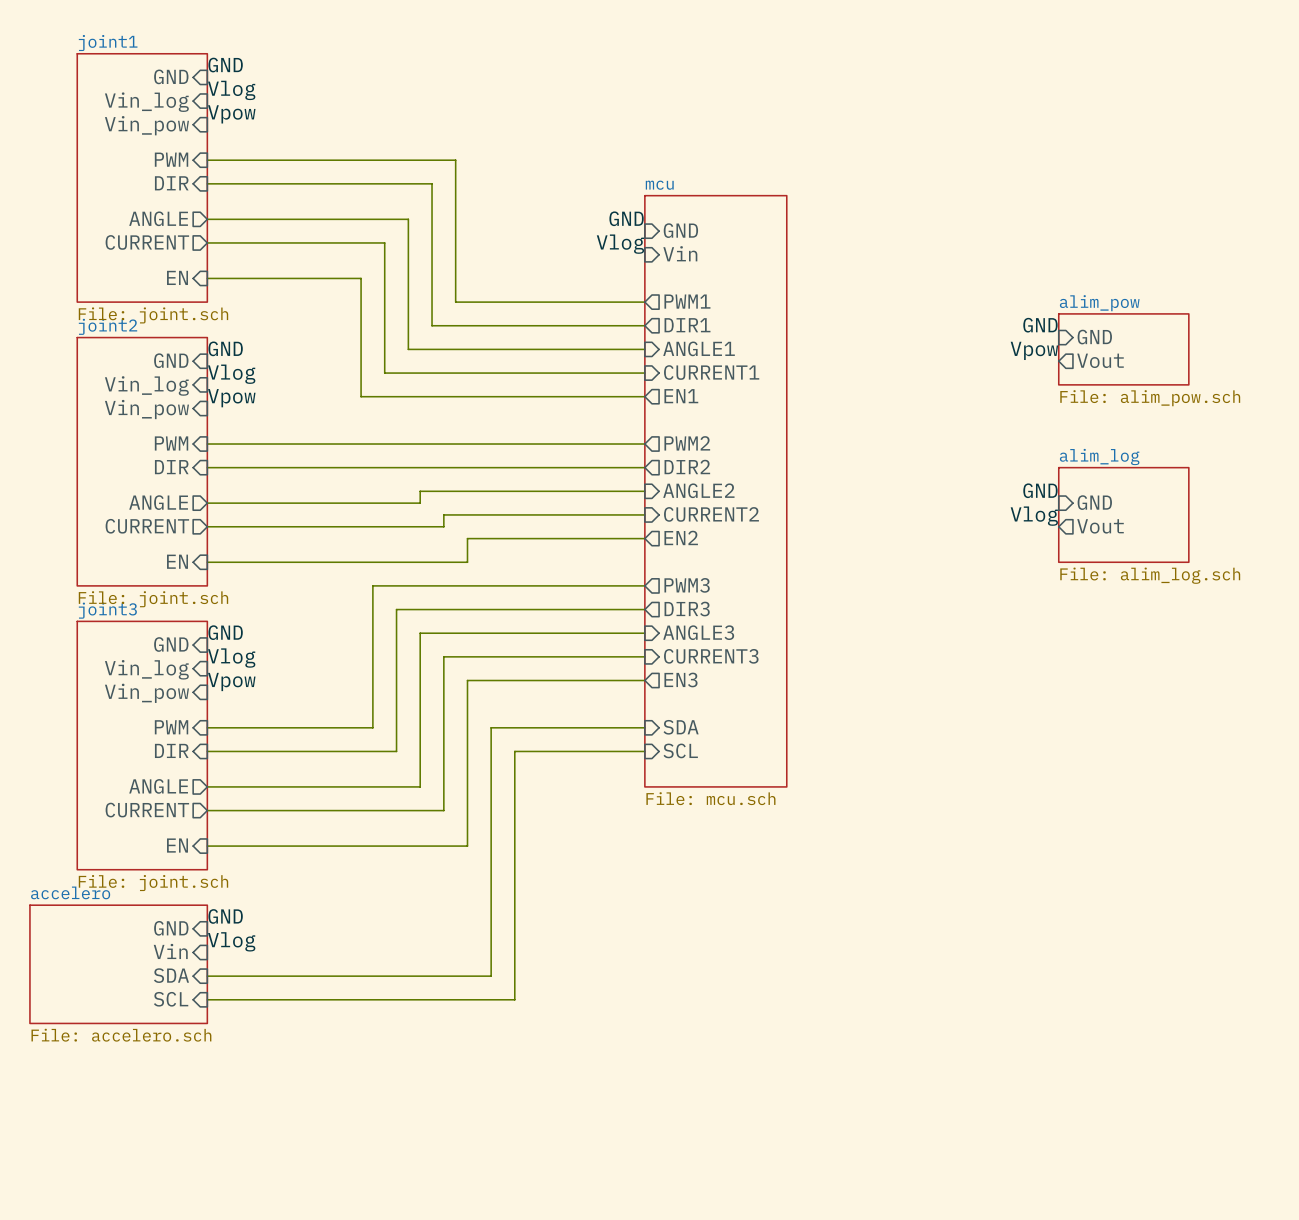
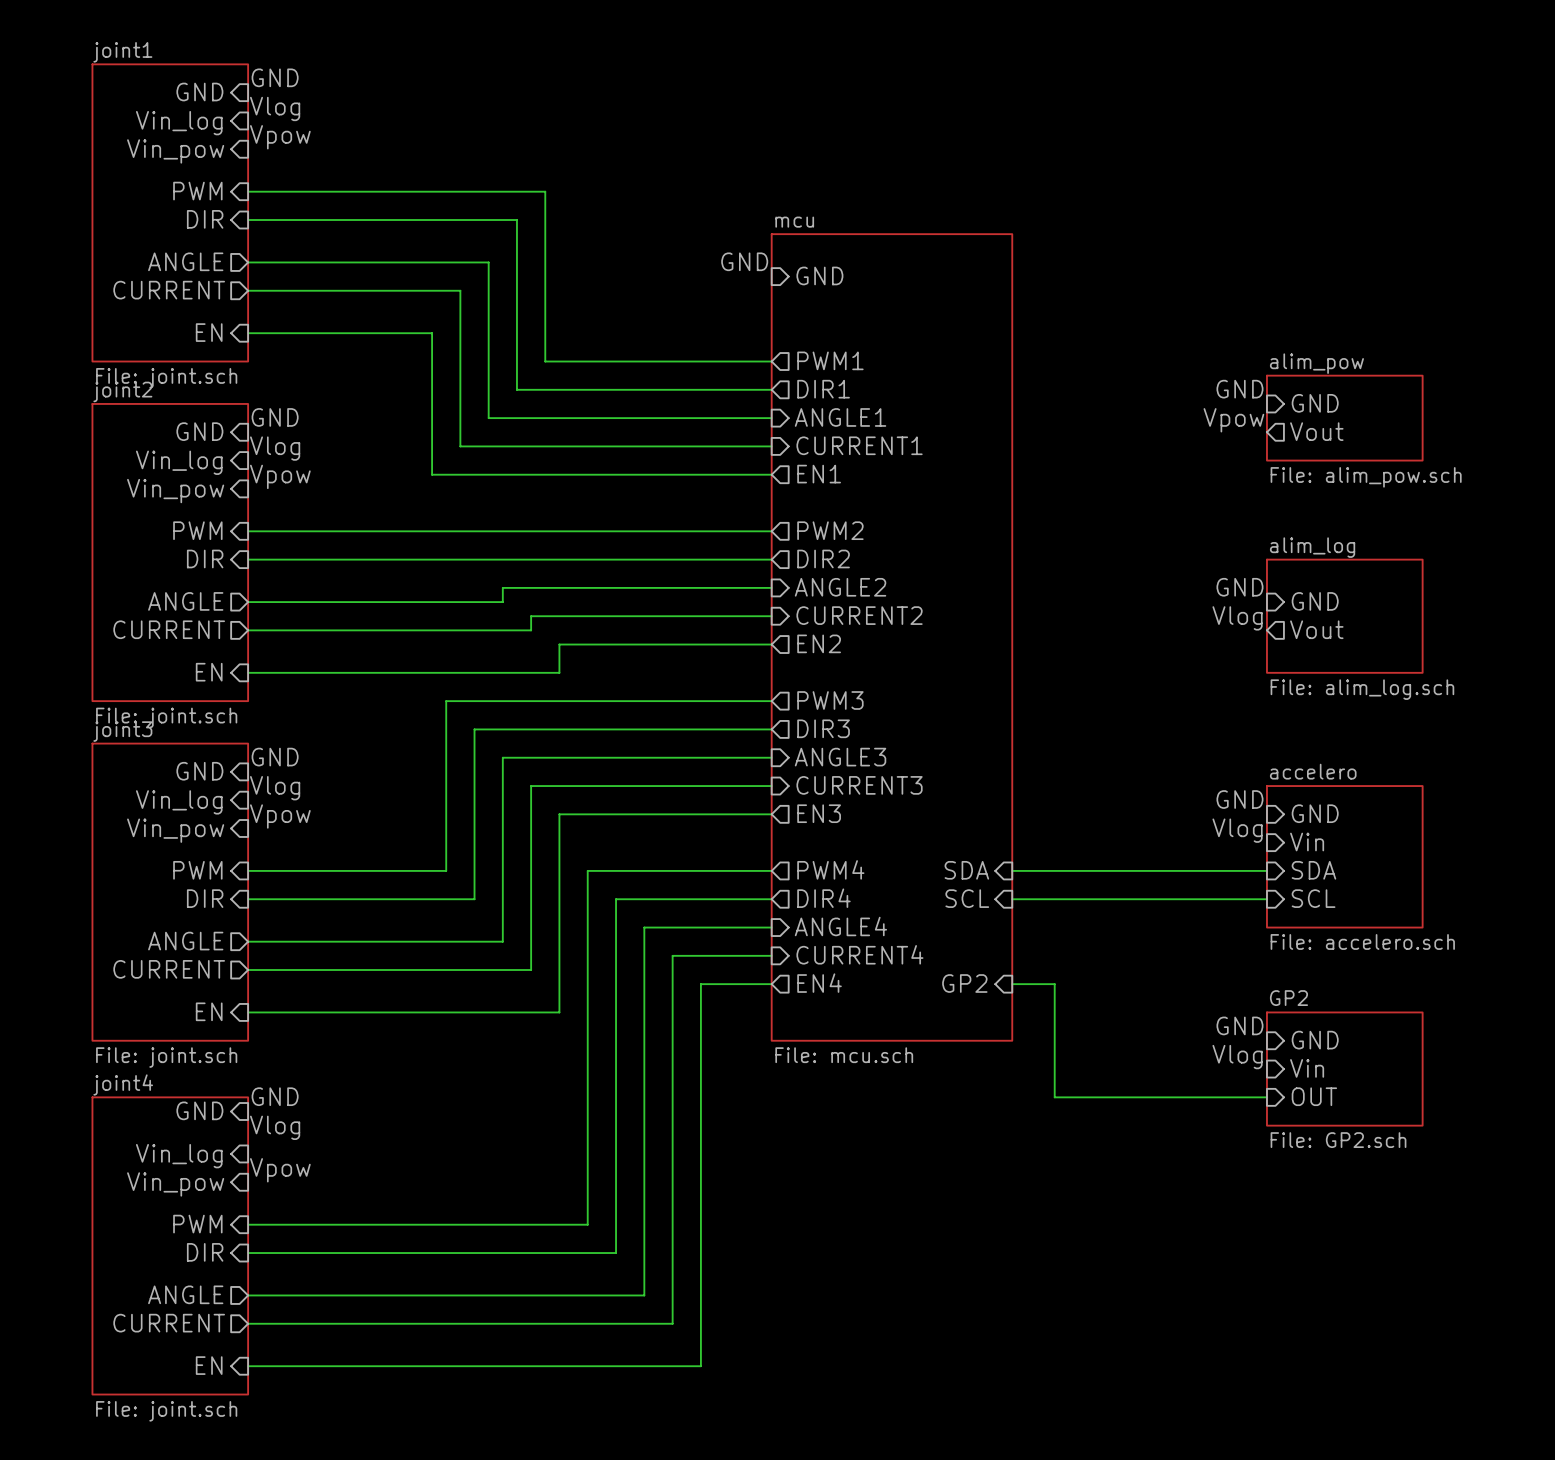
label: Vlog (620, 244) -> none
sheet pin: Vin (680, 253) -> none
sheet mcu: File: mcu.sch (715, 491) -> none
sheet mcu: none -> File: mcu.sch (891, 637)
label: none -> GND (1239, 799)
sheet pin: none -> GND (1315, 813)
label: none -> Vlog (1237, 830)
sheet pin: none -> Vin (1307, 842)
sheet accelero: none -> File: accelero.sch (1344, 856)
sheet pin shape: input (681, 727) -> output (830, 869)
sheet pin: SDA (681, 727) -> PWM4 (830, 869)
sheet pin: none -> SDA (966, 870)
wire: none -> (1012, 870) (1266, 870)
sheet pin: none -> SDA (1313, 870)
sheet pin shape: input (680, 750) -> output (823, 898)
sheet pin: SCL (680, 750) -> DIR4 (823, 898)
sheet pin: none -> SCL (967, 898)
sheet pin: none -> SCL (1313, 898)
wire: none -> (1012, 899) (1266, 899)
sheet pin: none -> ANGLE4 (840, 926)
wire: none -> (771, 927) (644, 927) (644, 1295) (248, 1295)
wire: none -> (771, 955) (672, 955) (672, 1323) (248, 1323)
sheet pin: none -> CURRENT4 (859, 954)
sheet pin: none -> EN4 (819, 983)
sheet pin: none -> GP2 (964, 983)
wire: none -> (771, 984) (700, 984) (700, 1366) (248, 1366)
wire: none -> (1012, 984) (1054, 984) (1054, 1097) (1266, 1097)
label: none -> GND (1239, 1025)
sheet pin: none -> GND (1315, 1040)
label: none -> Vlog (1237, 1057)
sheet pin: none -> Vin (1307, 1068)
sheet GP2: none -> File: GP2.sch (1344, 1069)
sheet pin: none -> OUT (1314, 1096)
sheet pin: Vin (170, 951) -> none
sheet accelero: File: accelero.sch (118, 964) -> none
sheet pin: none -> Vin_log (179, 1156)
sheet pin: SDA (171, 975) -> none
wire: (207, 976) (491, 976) -> (248, 1224) (587, 1224) (587, 1168)
label: none -> Vpow (280, 1170)
sheet pin: none -> Vin_pow (175, 1184)
sheet pin: SCL (171, 999) -> none
wire: (207, 999) (514, 999) -> (248, 1253) (616, 1253) (616, 1196)
sheet pin: none -> PWM (197, 1224)
sheet joint4: none -> File: joint.sch (170, 1245)
sheet pin: none -> DIR (205, 1252)
sheet pin: none -> ANGLE (185, 1294)
sheet pin: none -> CURRENT (169, 1323)
sheet pin: none -> EN (209, 1365)

